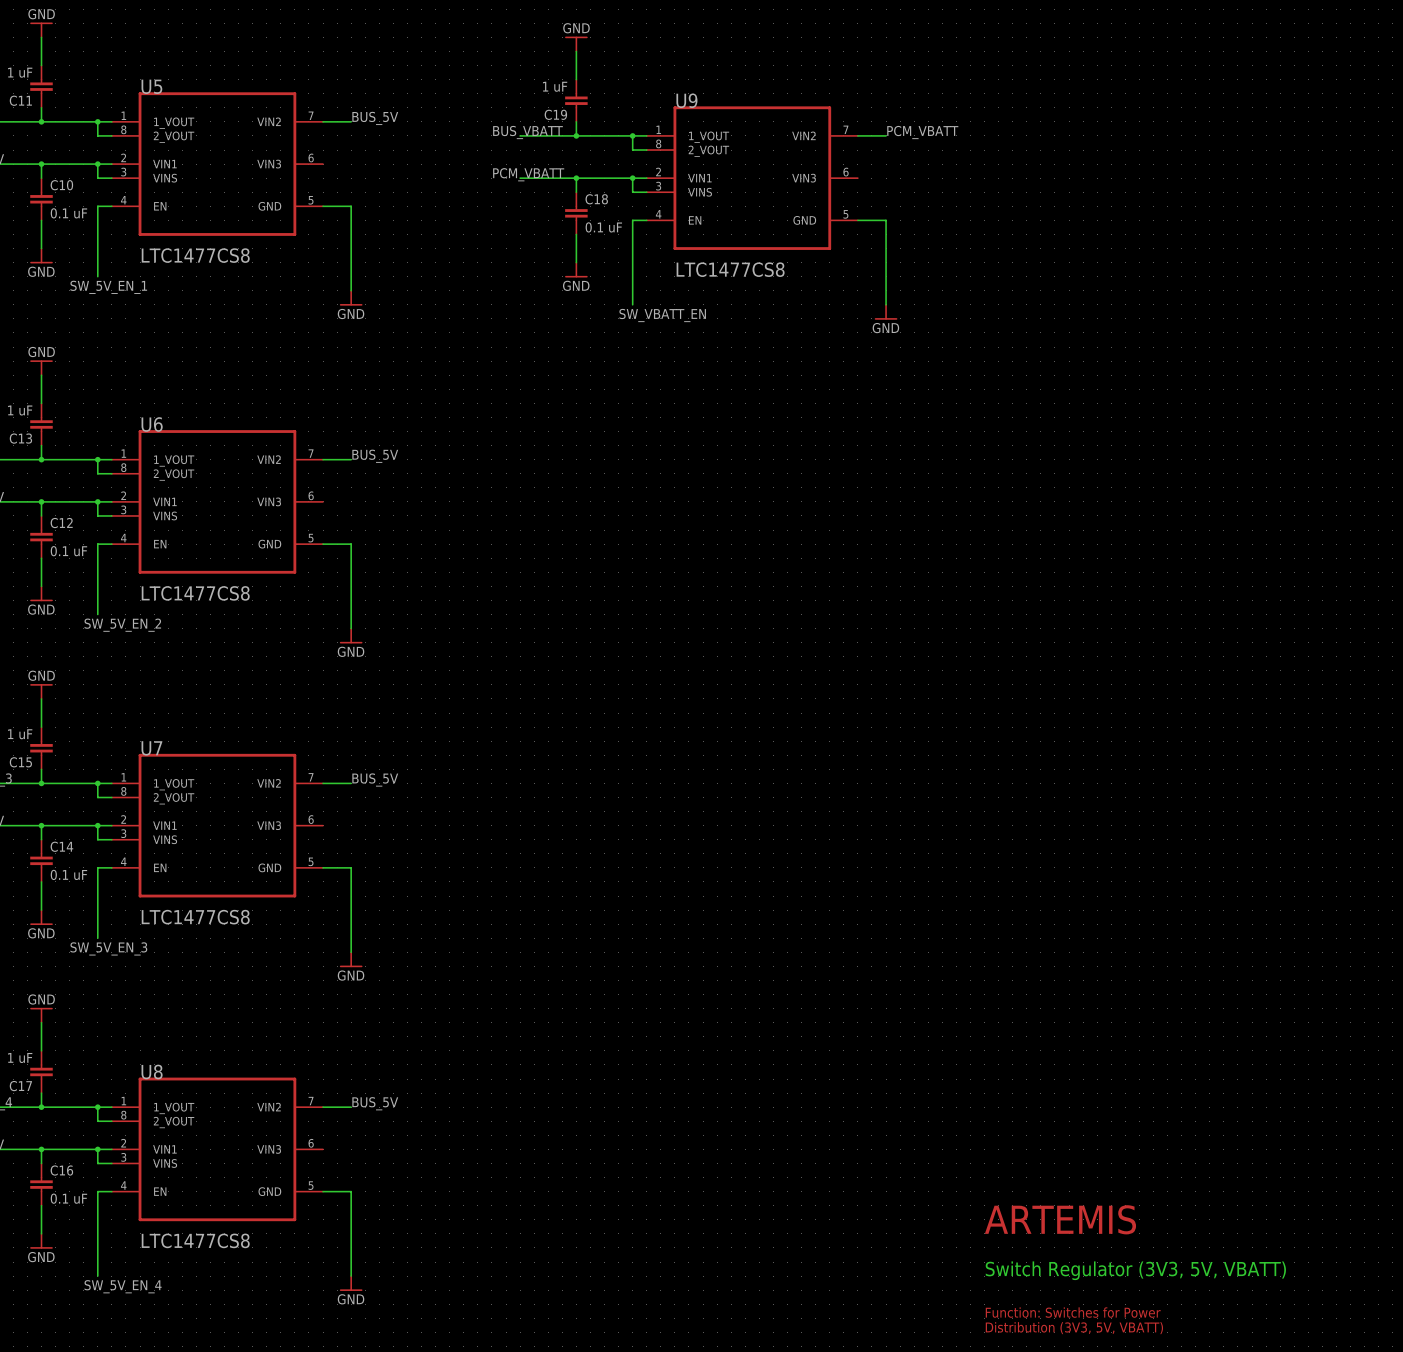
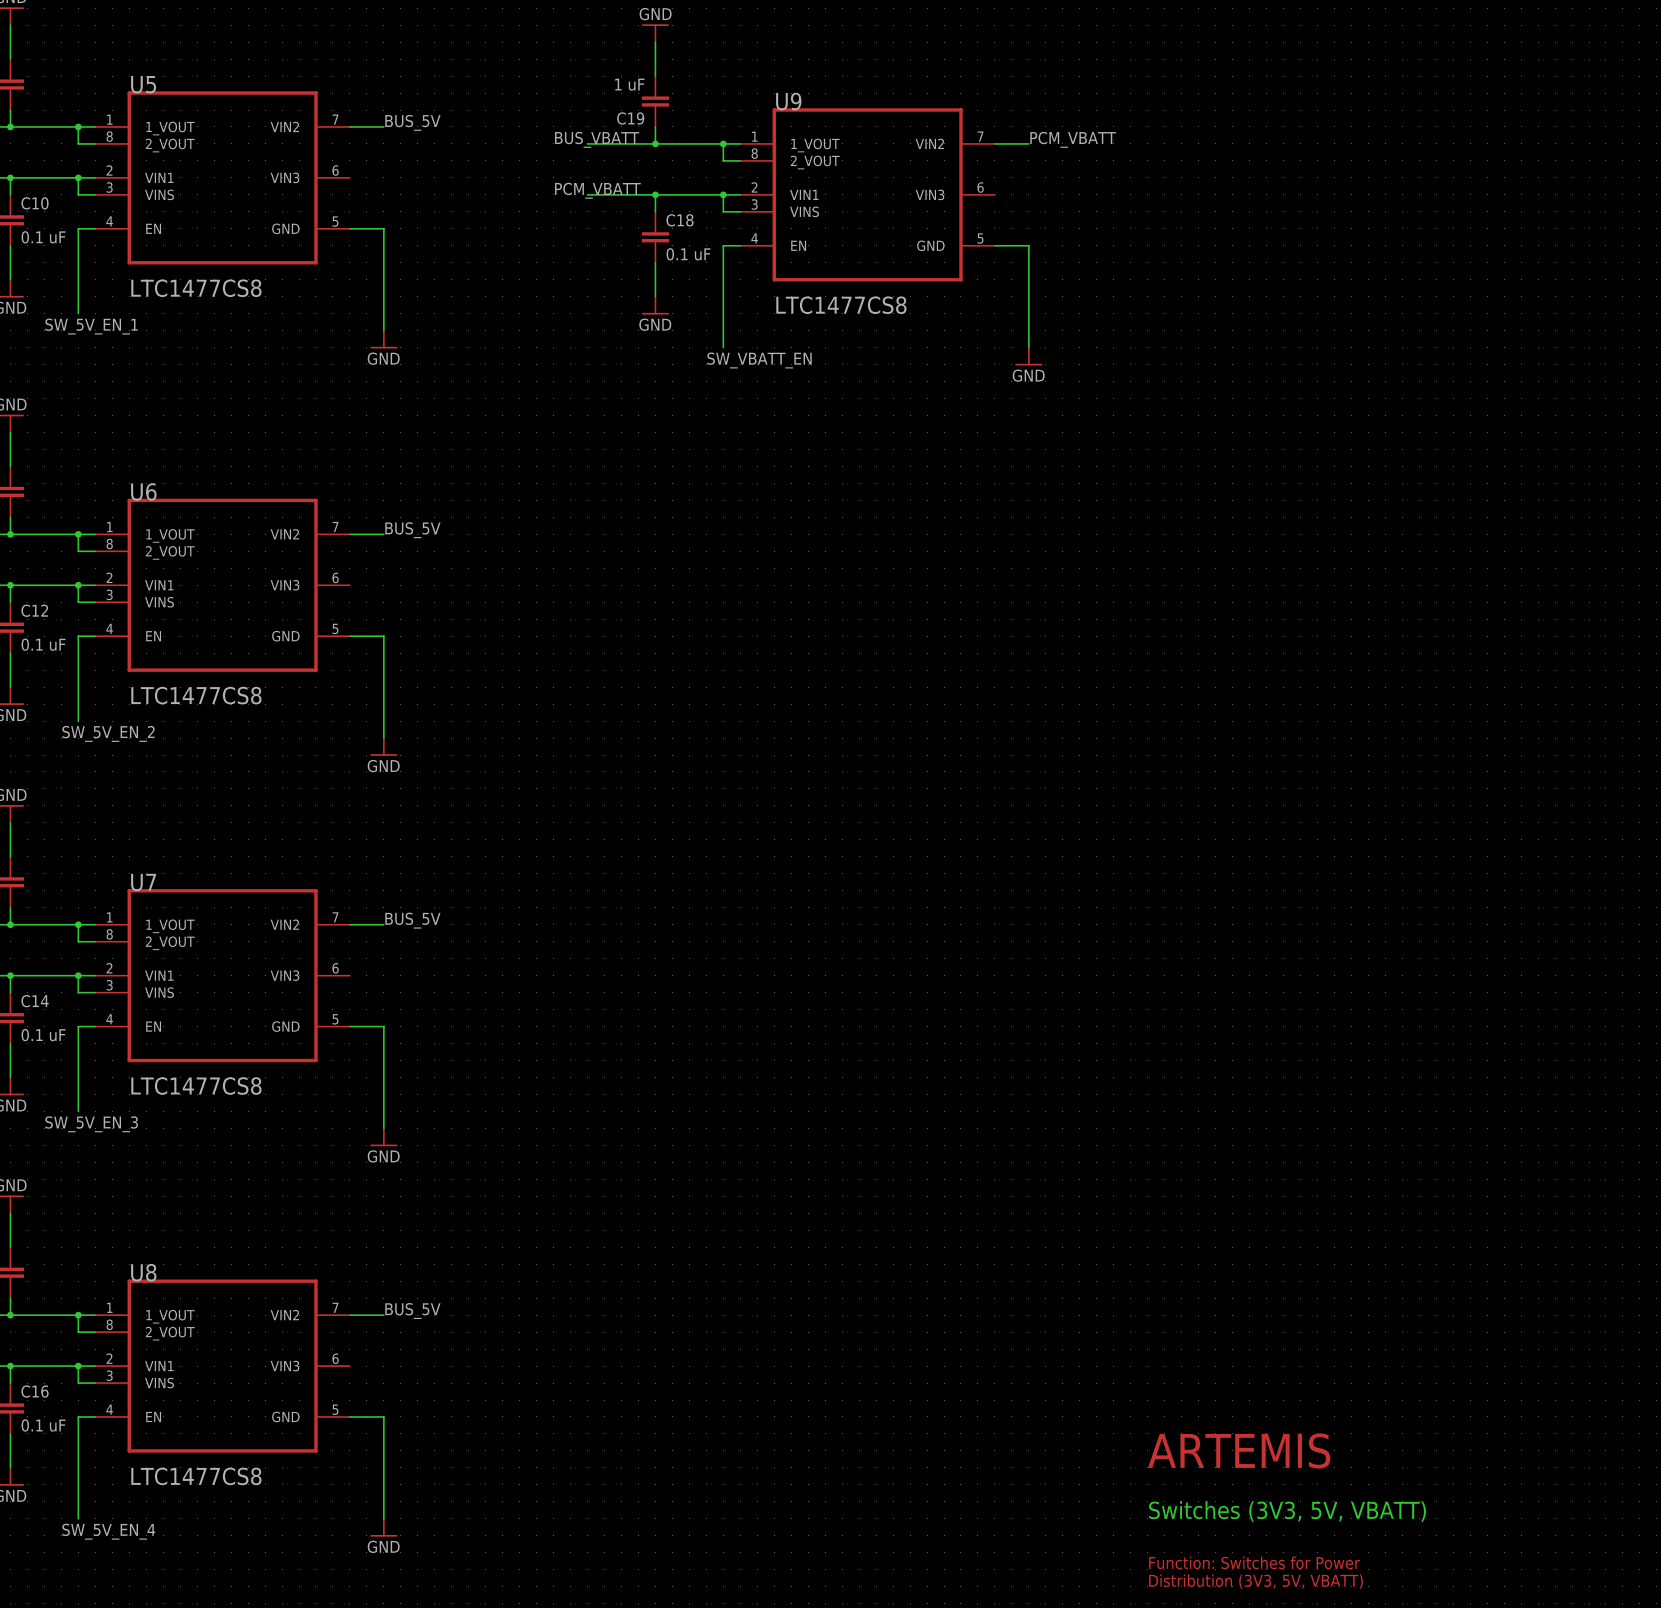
text: Switch Regulator (3V3, 5V, VBATT) (1135, 1270) -> Switches (3V3, 5V, VBATT) (1287, 1511)

